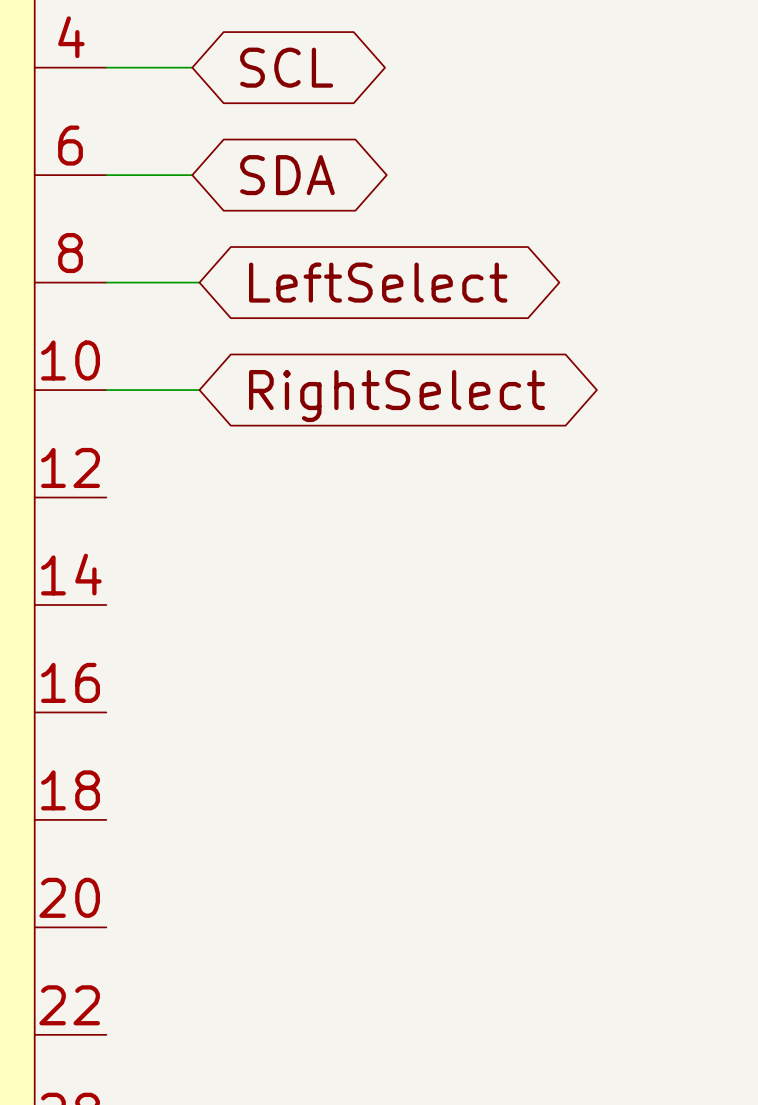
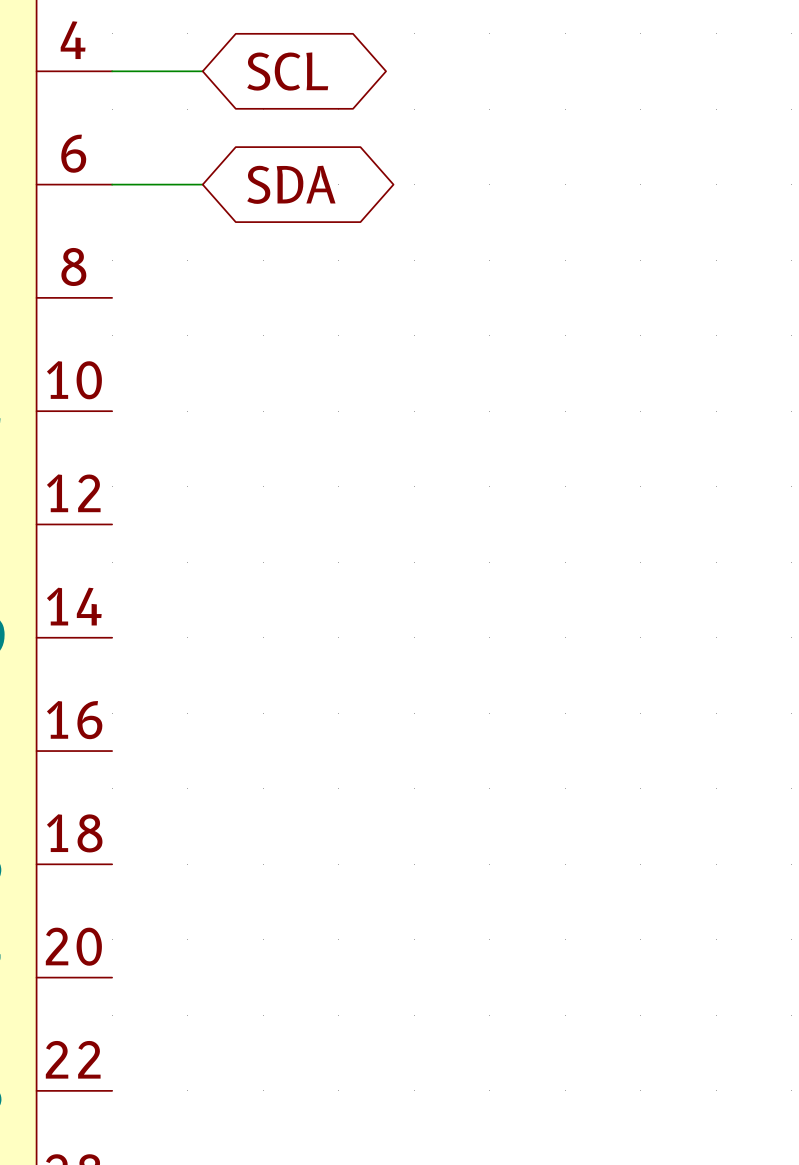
wire: (106, 282) (199, 282) -> none
global label: LeftSelect (378, 282) -> none
wire: (106, 390) (199, 390) -> none
global label: RightSelect (396, 396) -> none

